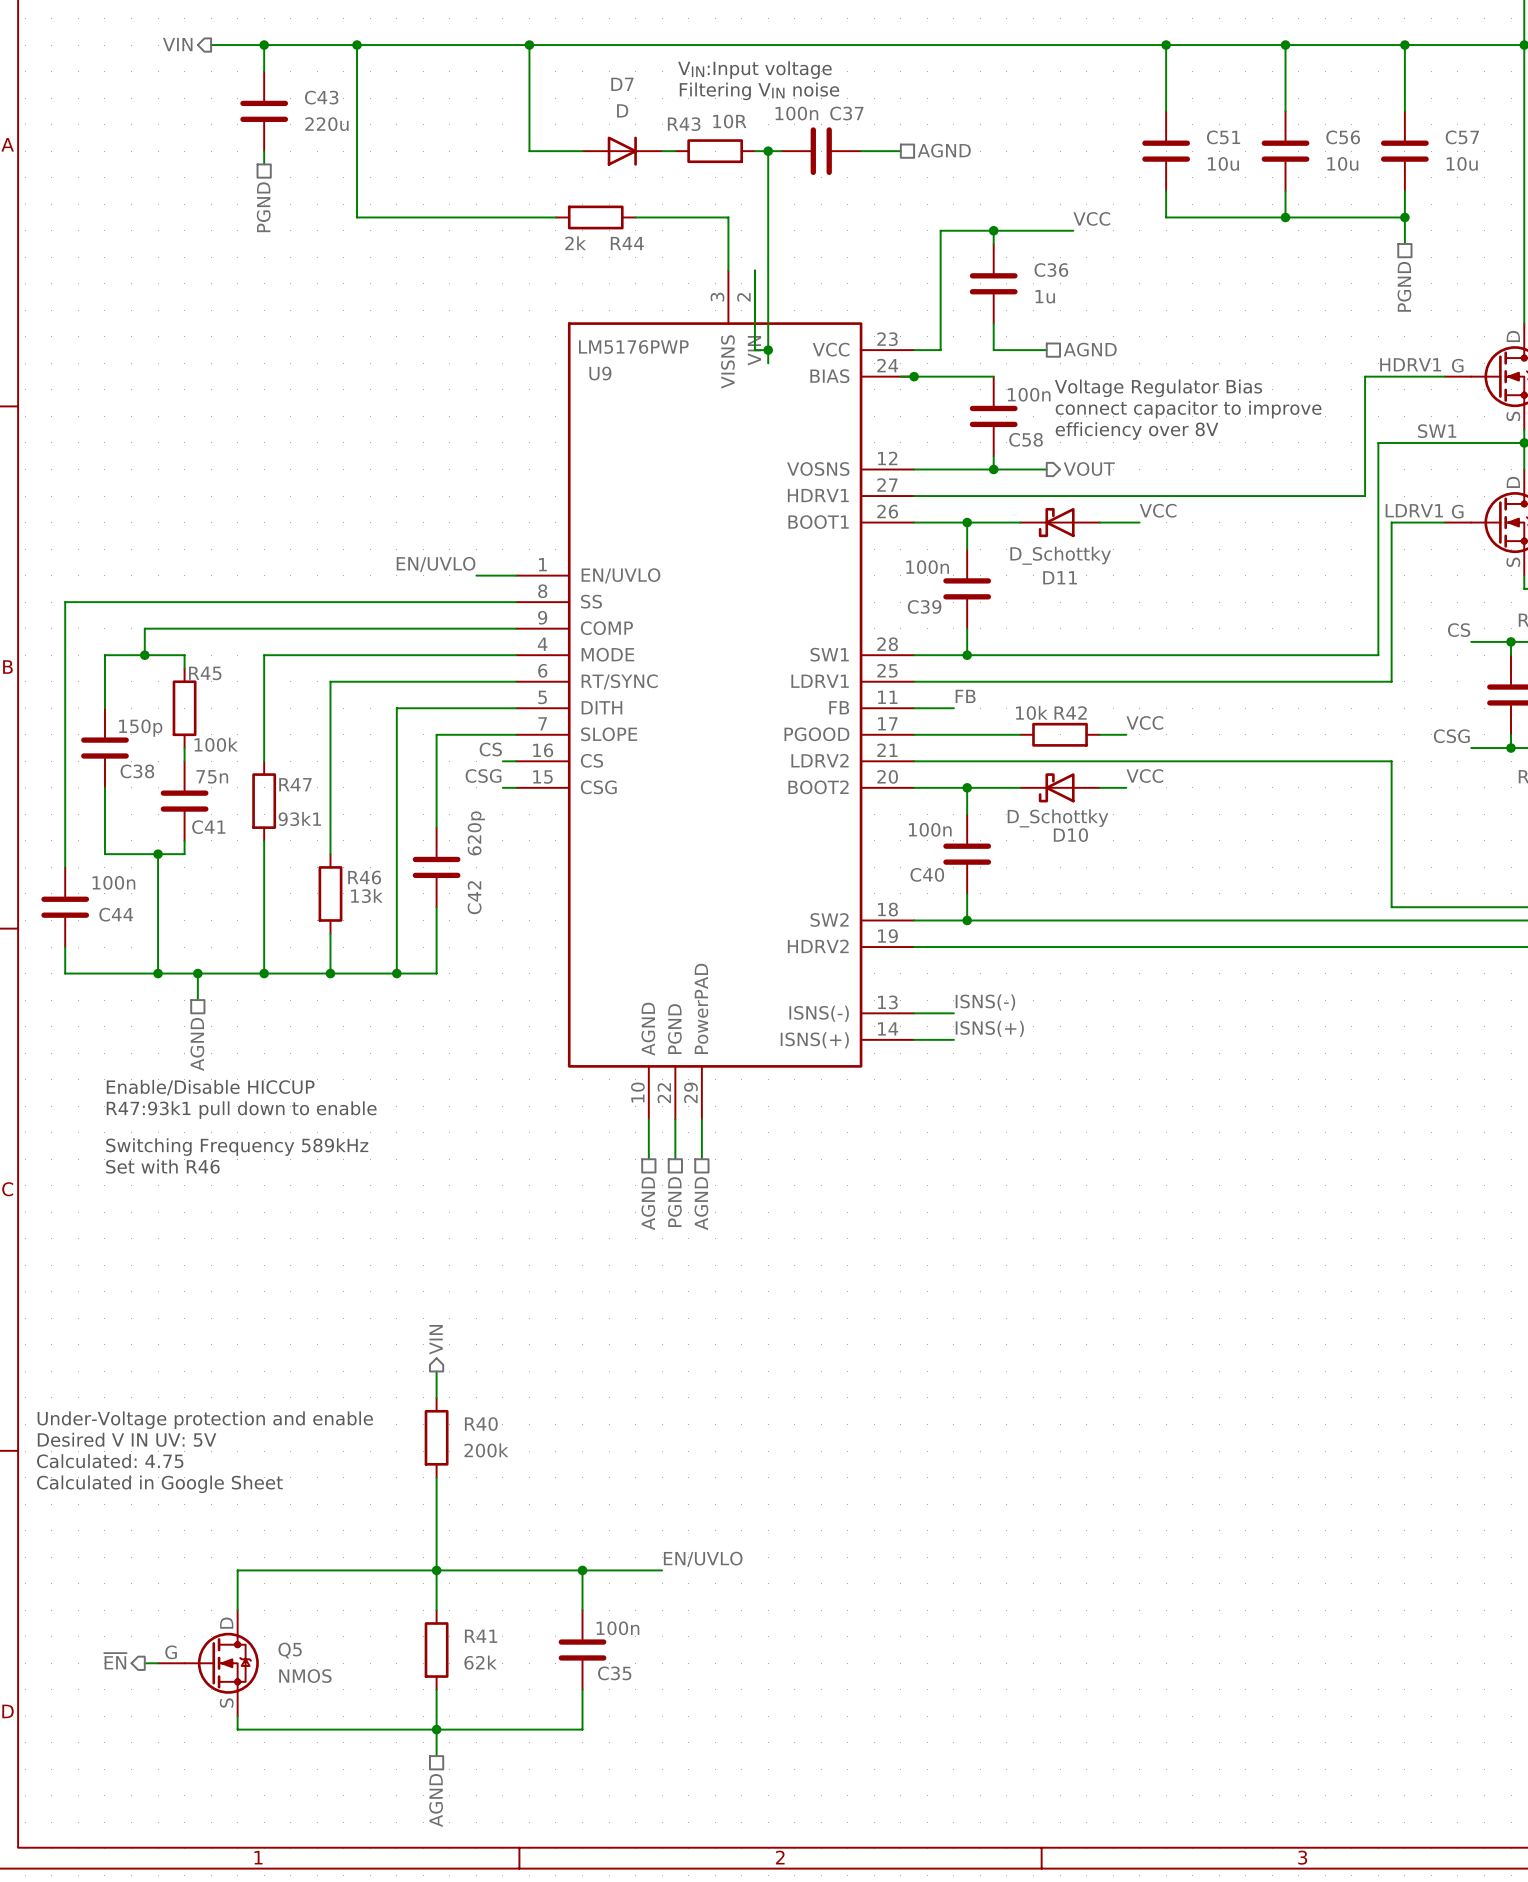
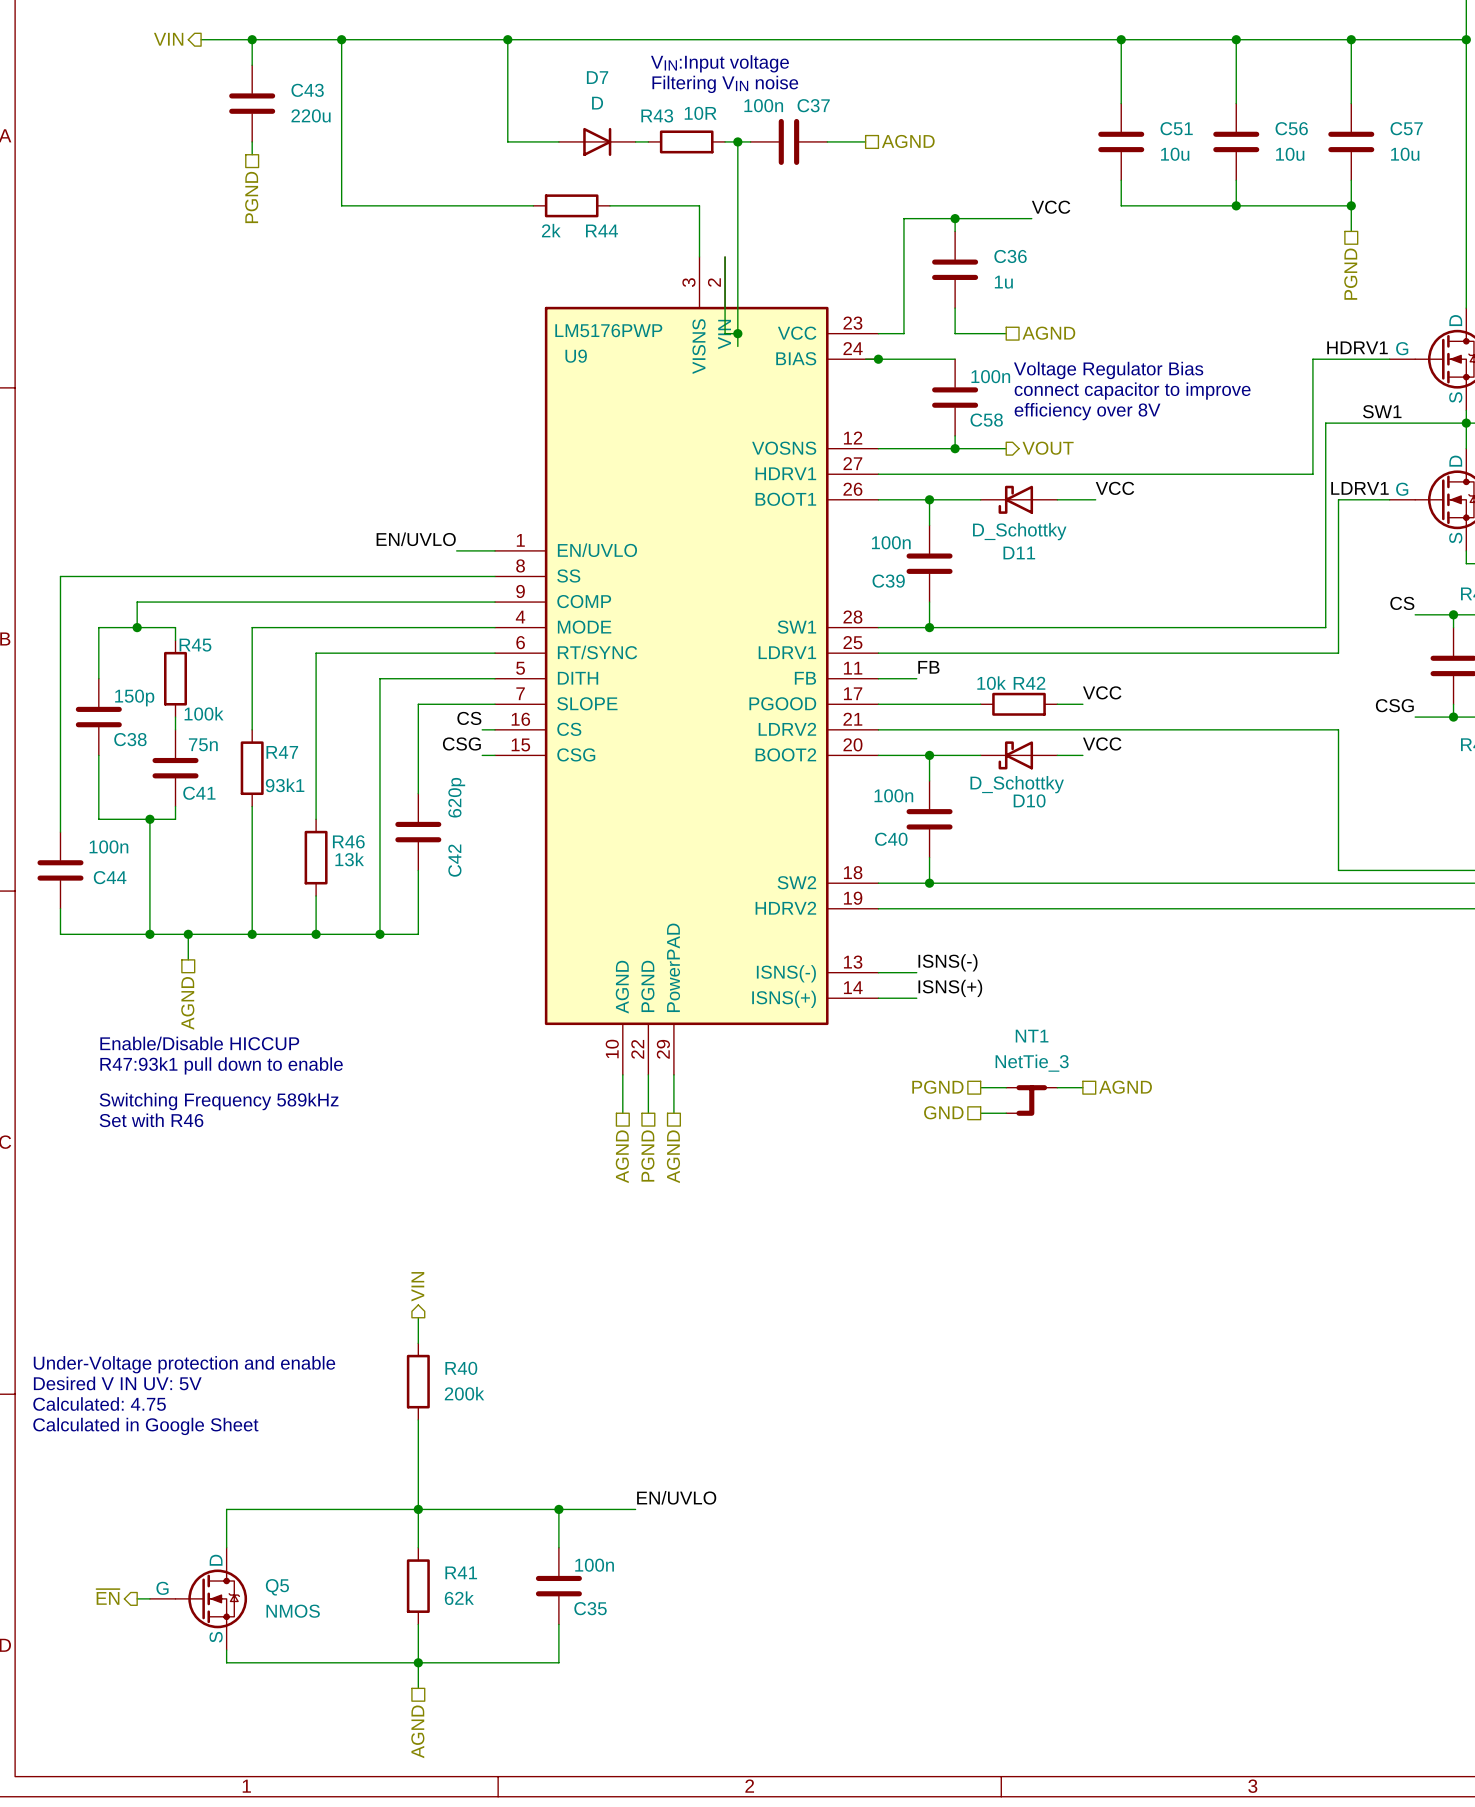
hierarchical label: none -> PGND (937, 1087)
wire: none -> (980, 1087) (1006, 1087)
wire: none -> (1057, 1087) (1082, 1087)
hierarchical label: none -> AGND (1125, 1087)
NT1: none -> NetTie_3 (1031, 1100)
hierarchical label: none -> GND (943, 1112)
wire: none -> (980, 1113) (1006, 1113)

